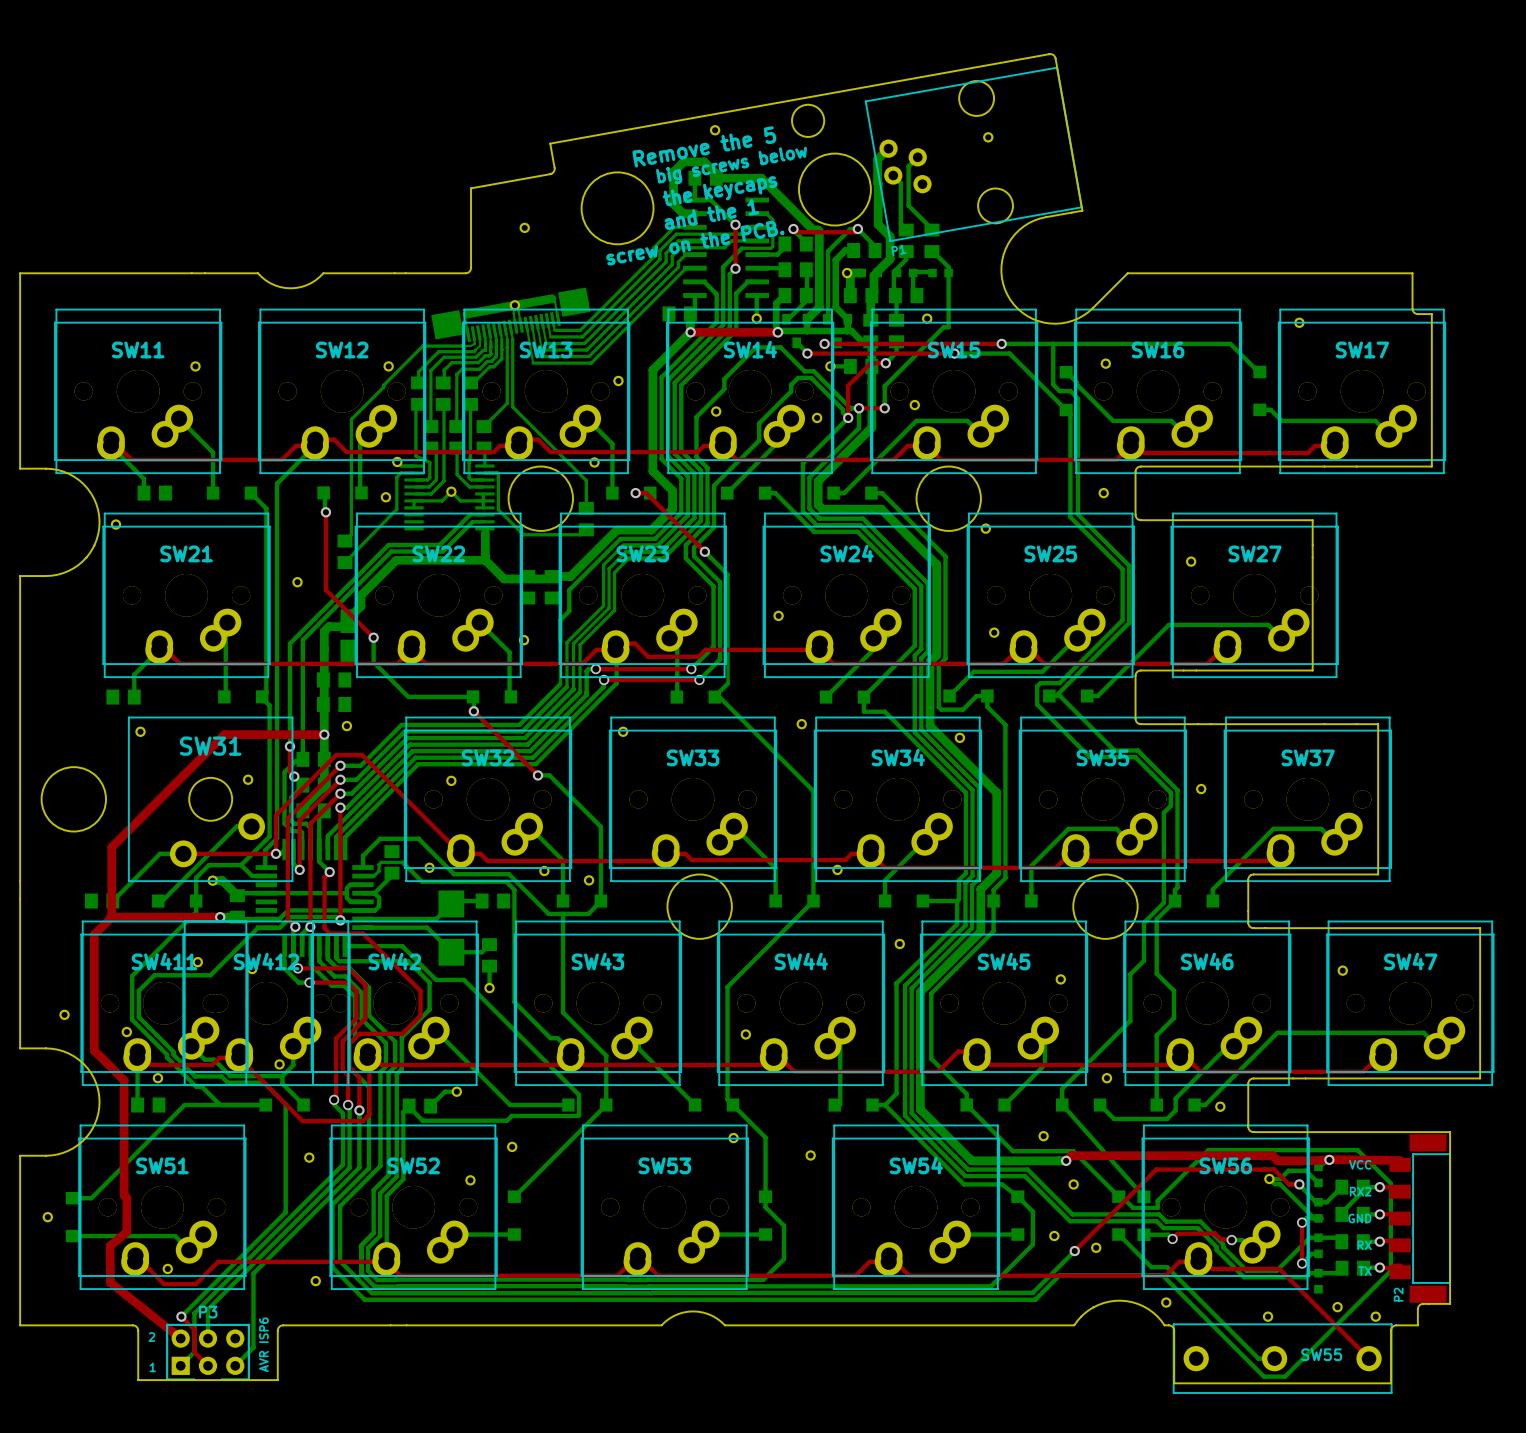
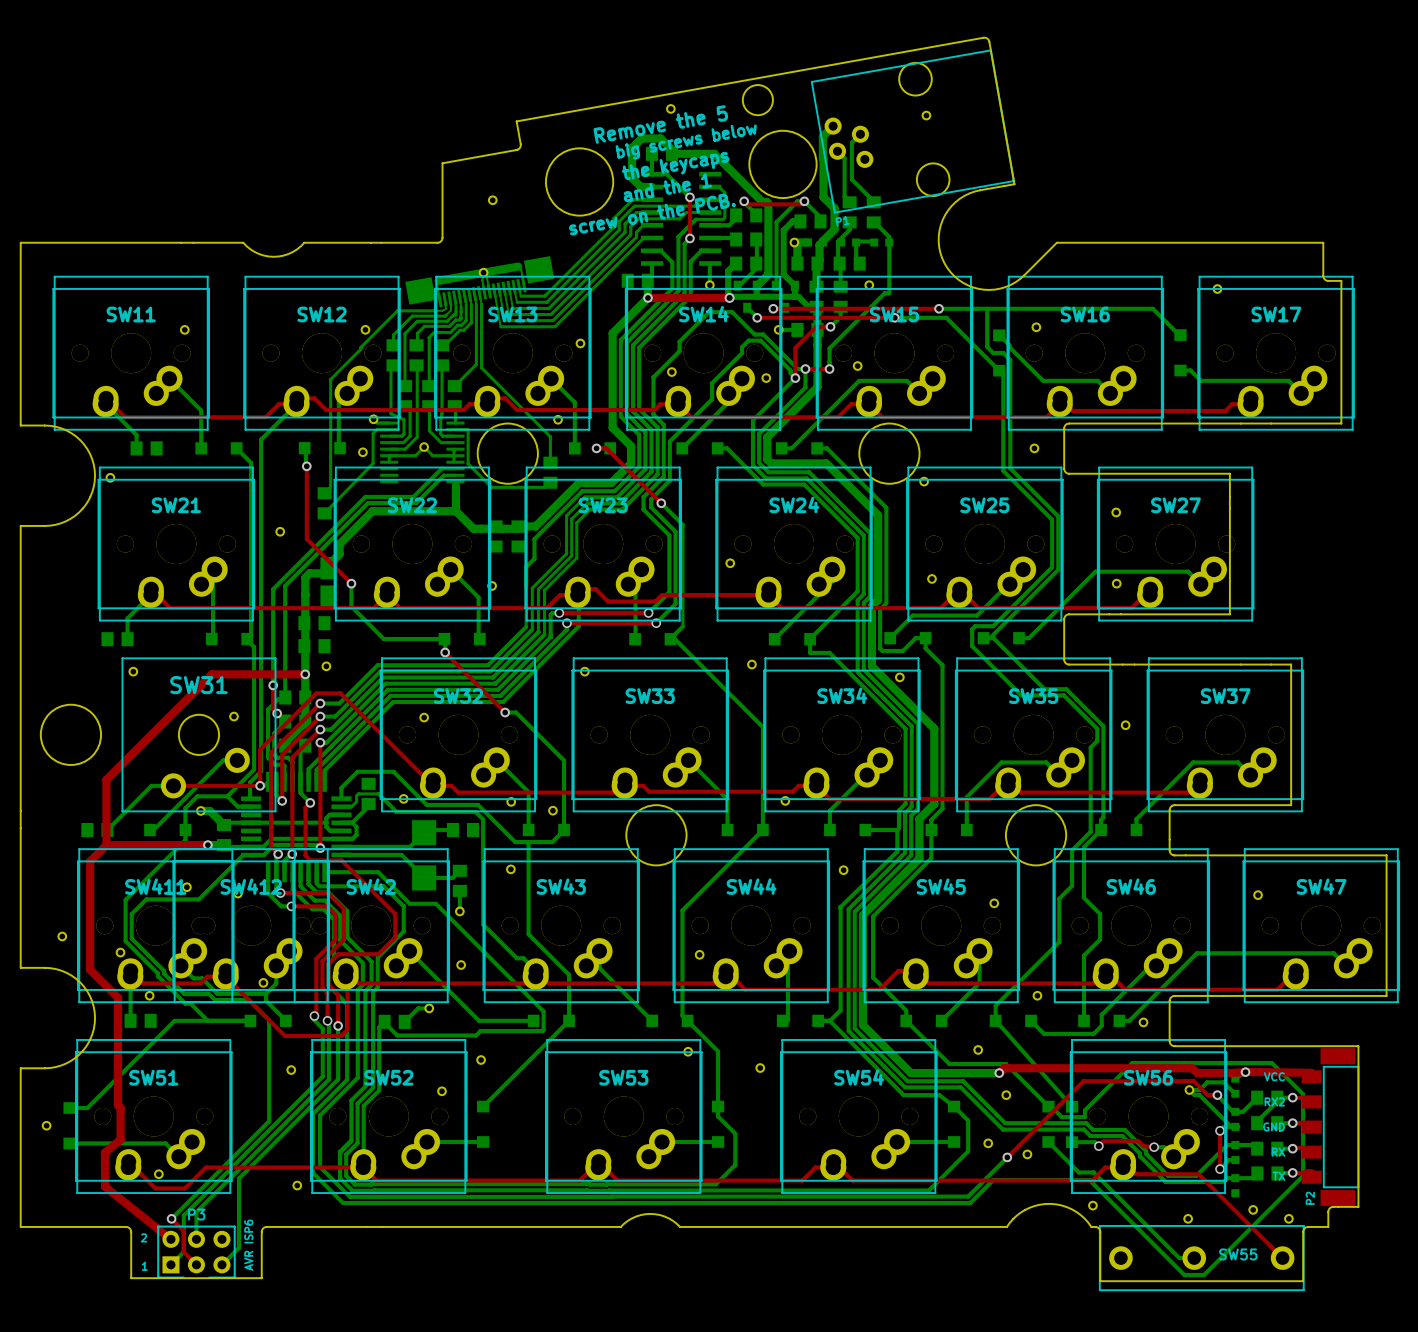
part: none -> (1116, 583)
part: none -> (510, 869)
part: none -> (461, 965)

